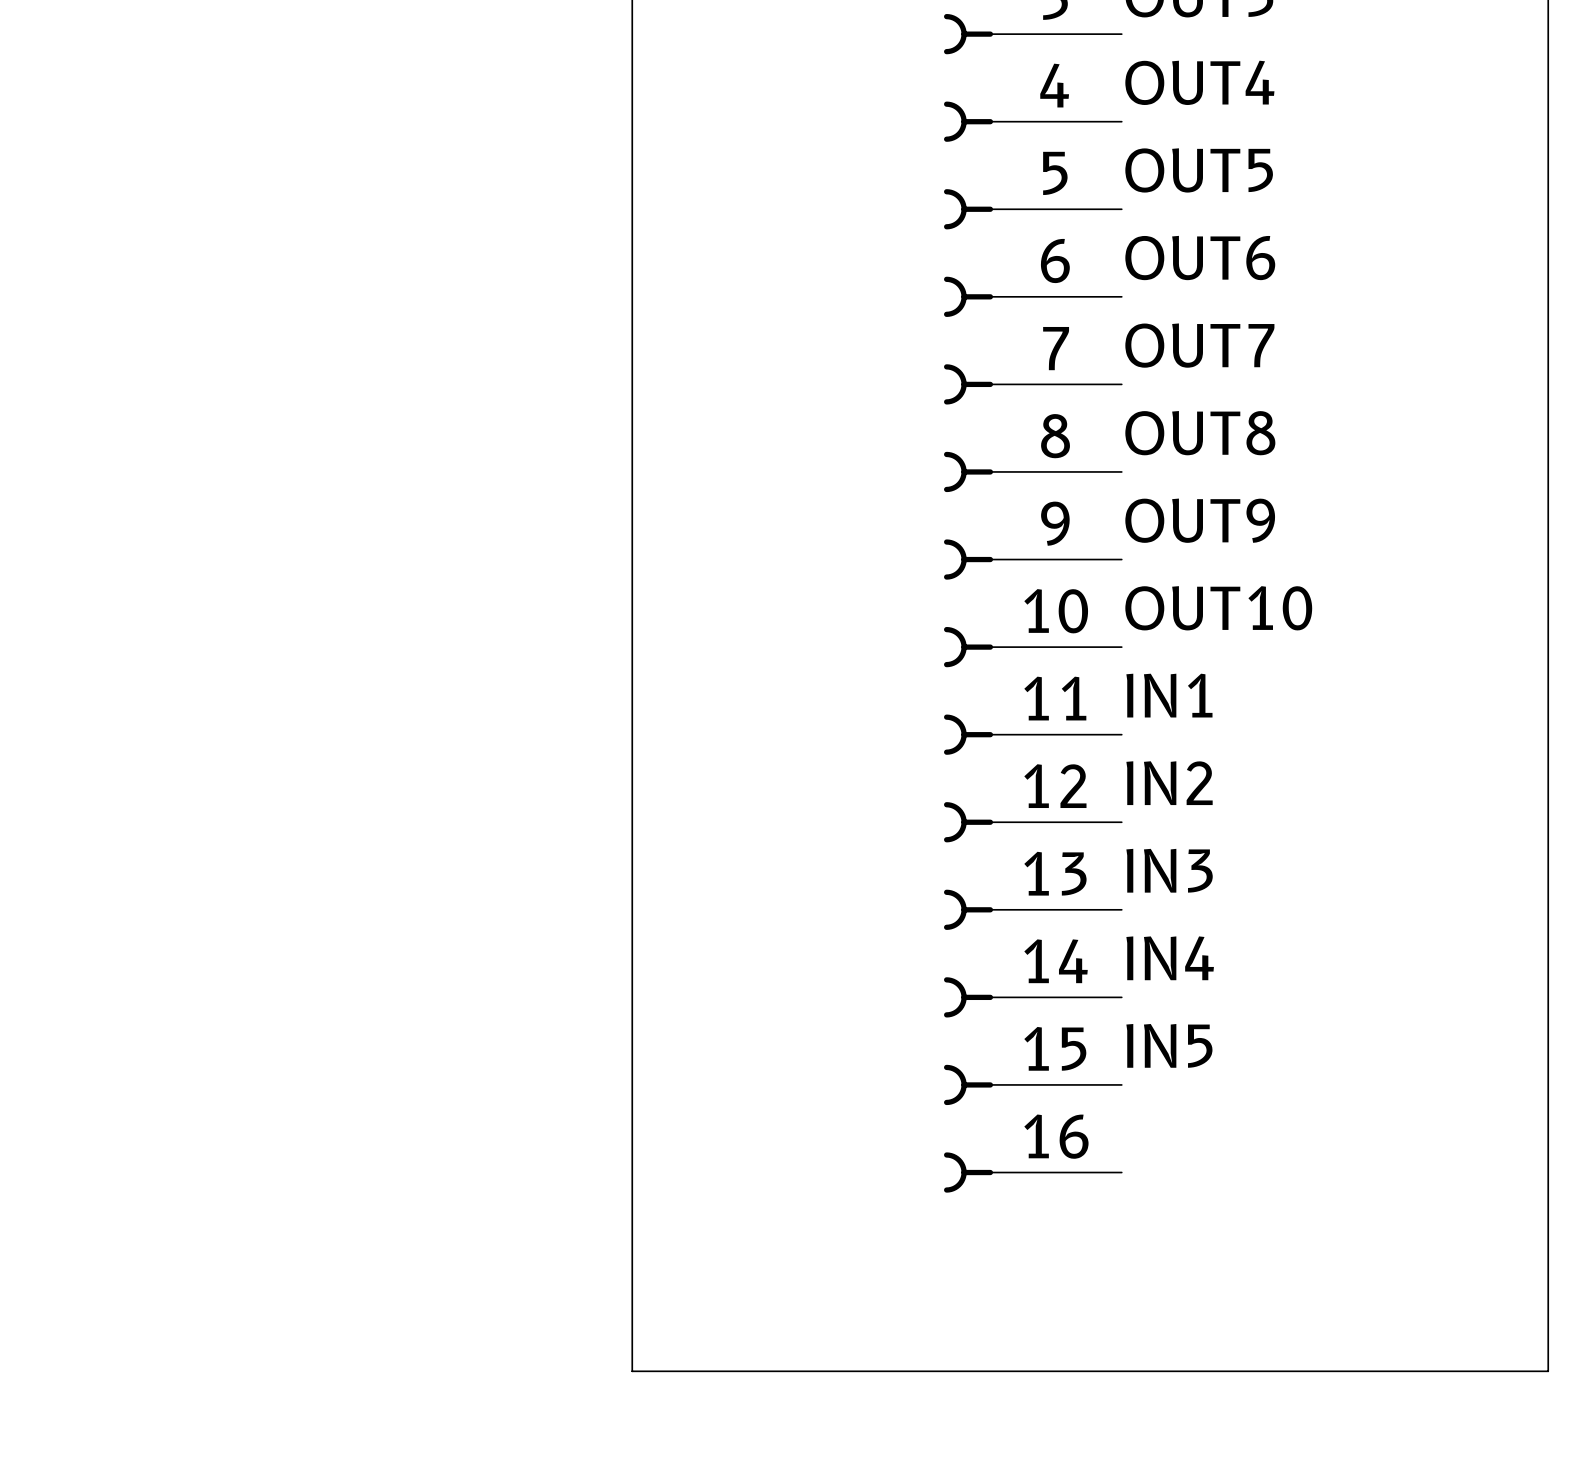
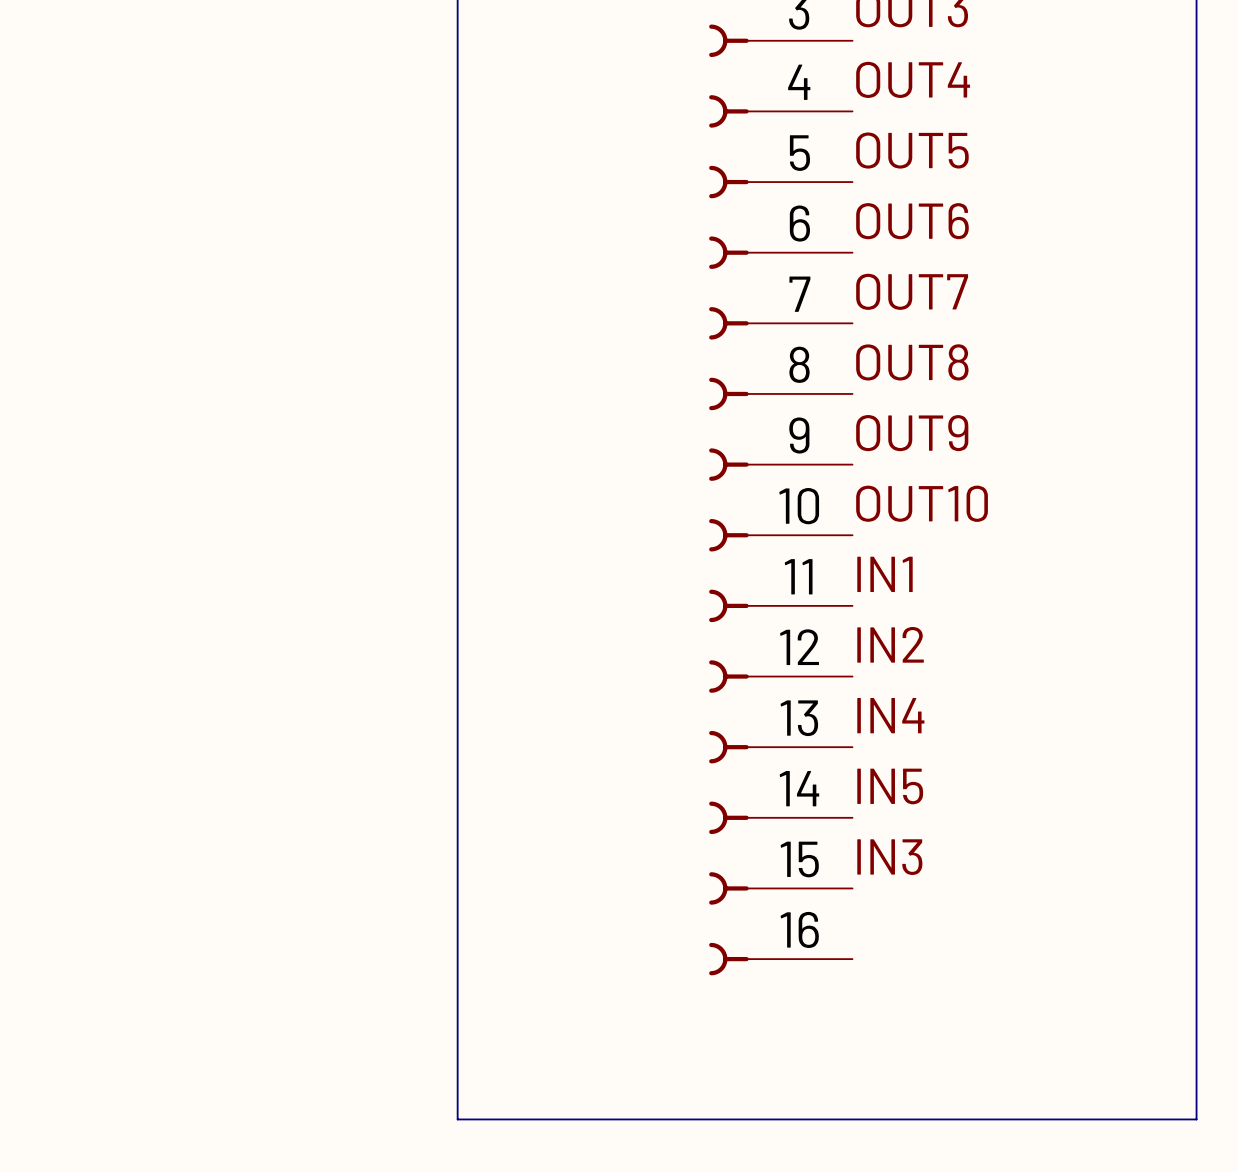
label: IN3 (1169, 870) -> IN4 (890, 715)
label: IN4 (1170, 958) -> IN5 (890, 786)
label: IN5 (1169, 1045) -> IN3 (889, 857)

